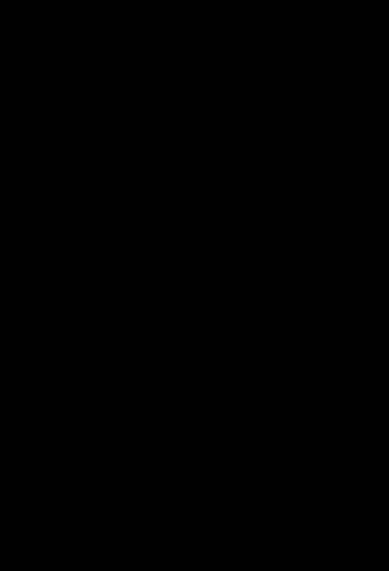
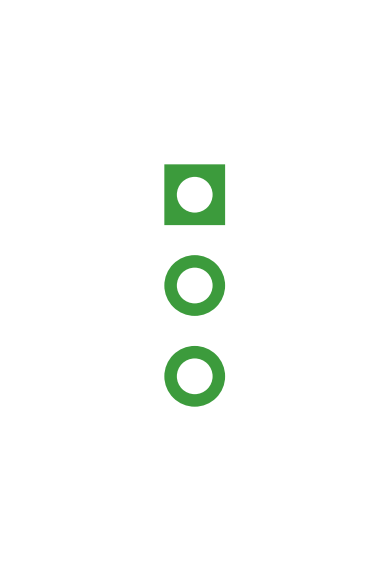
part: none -> (194, 285)

